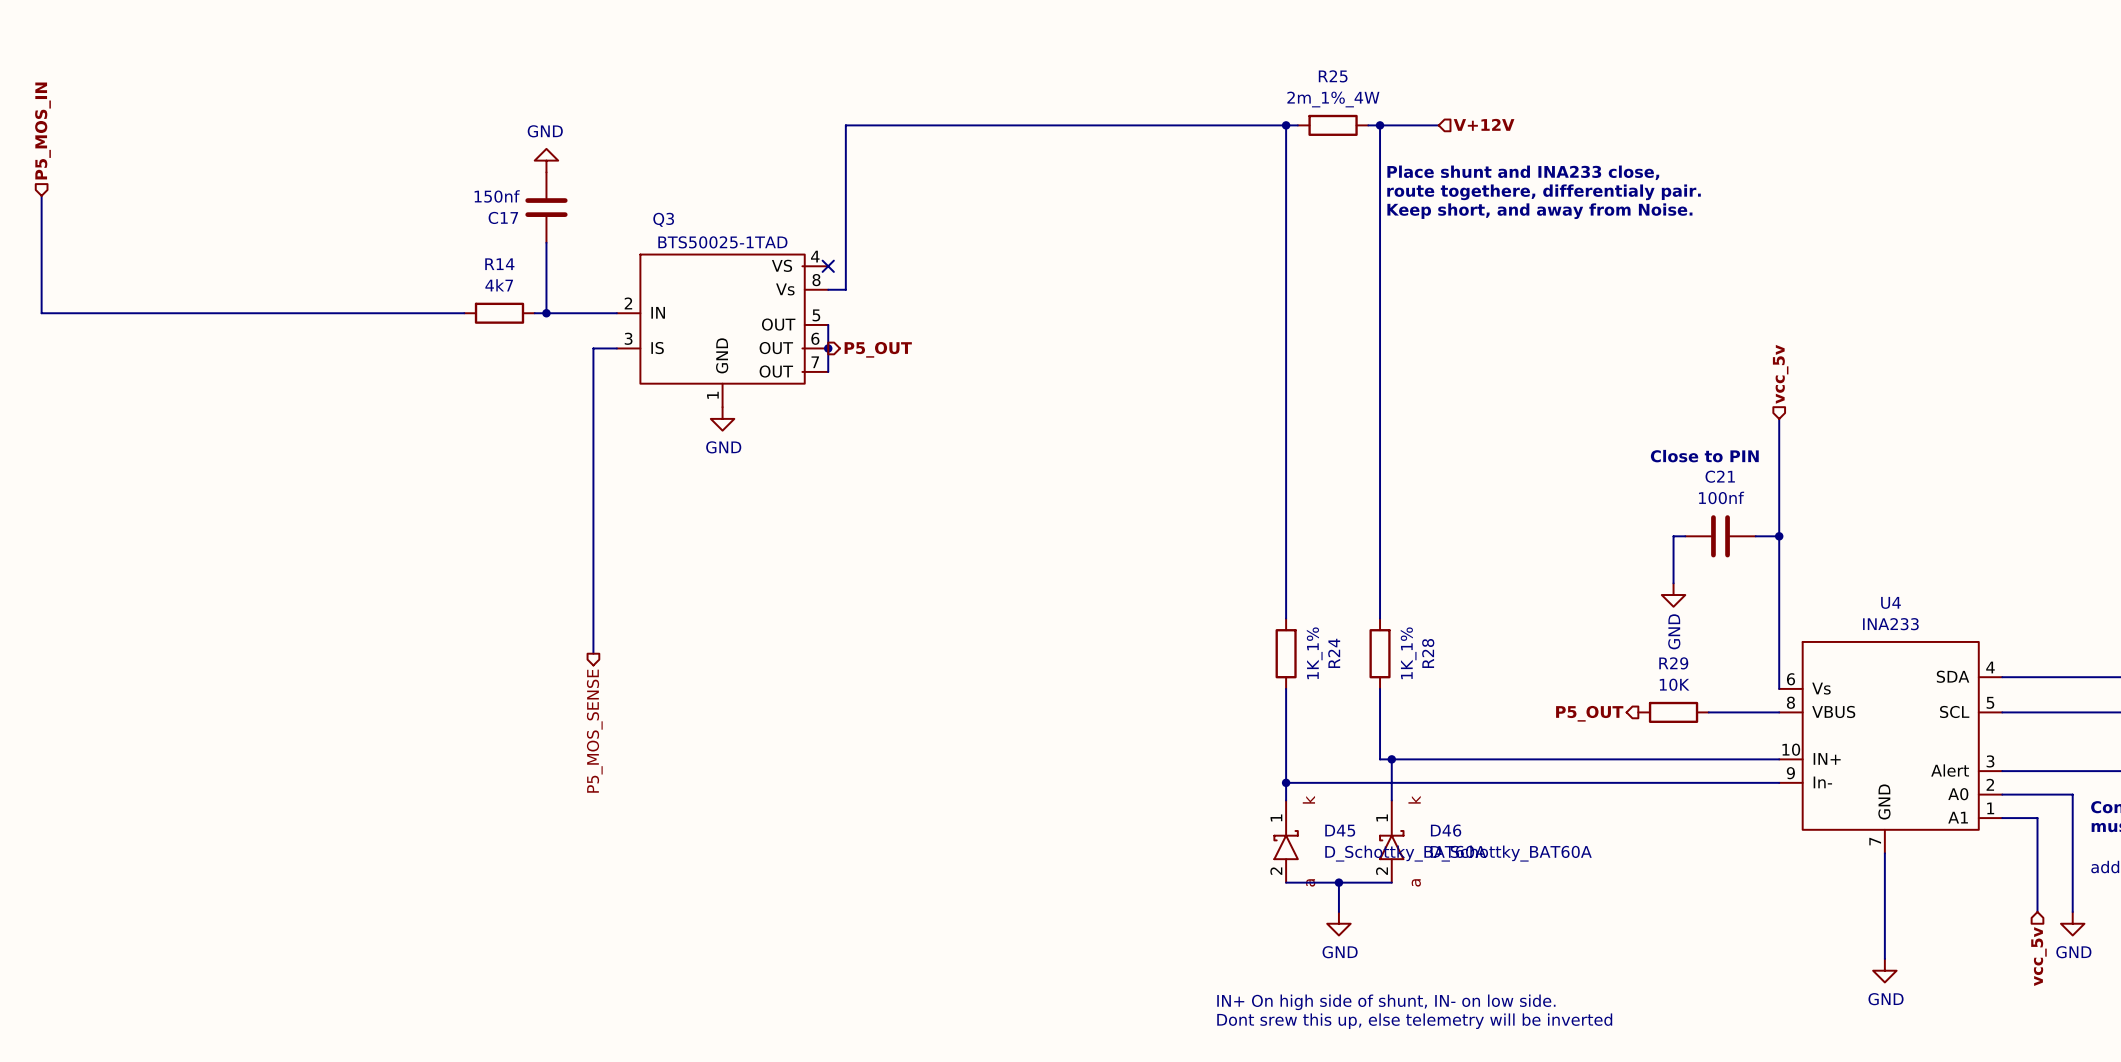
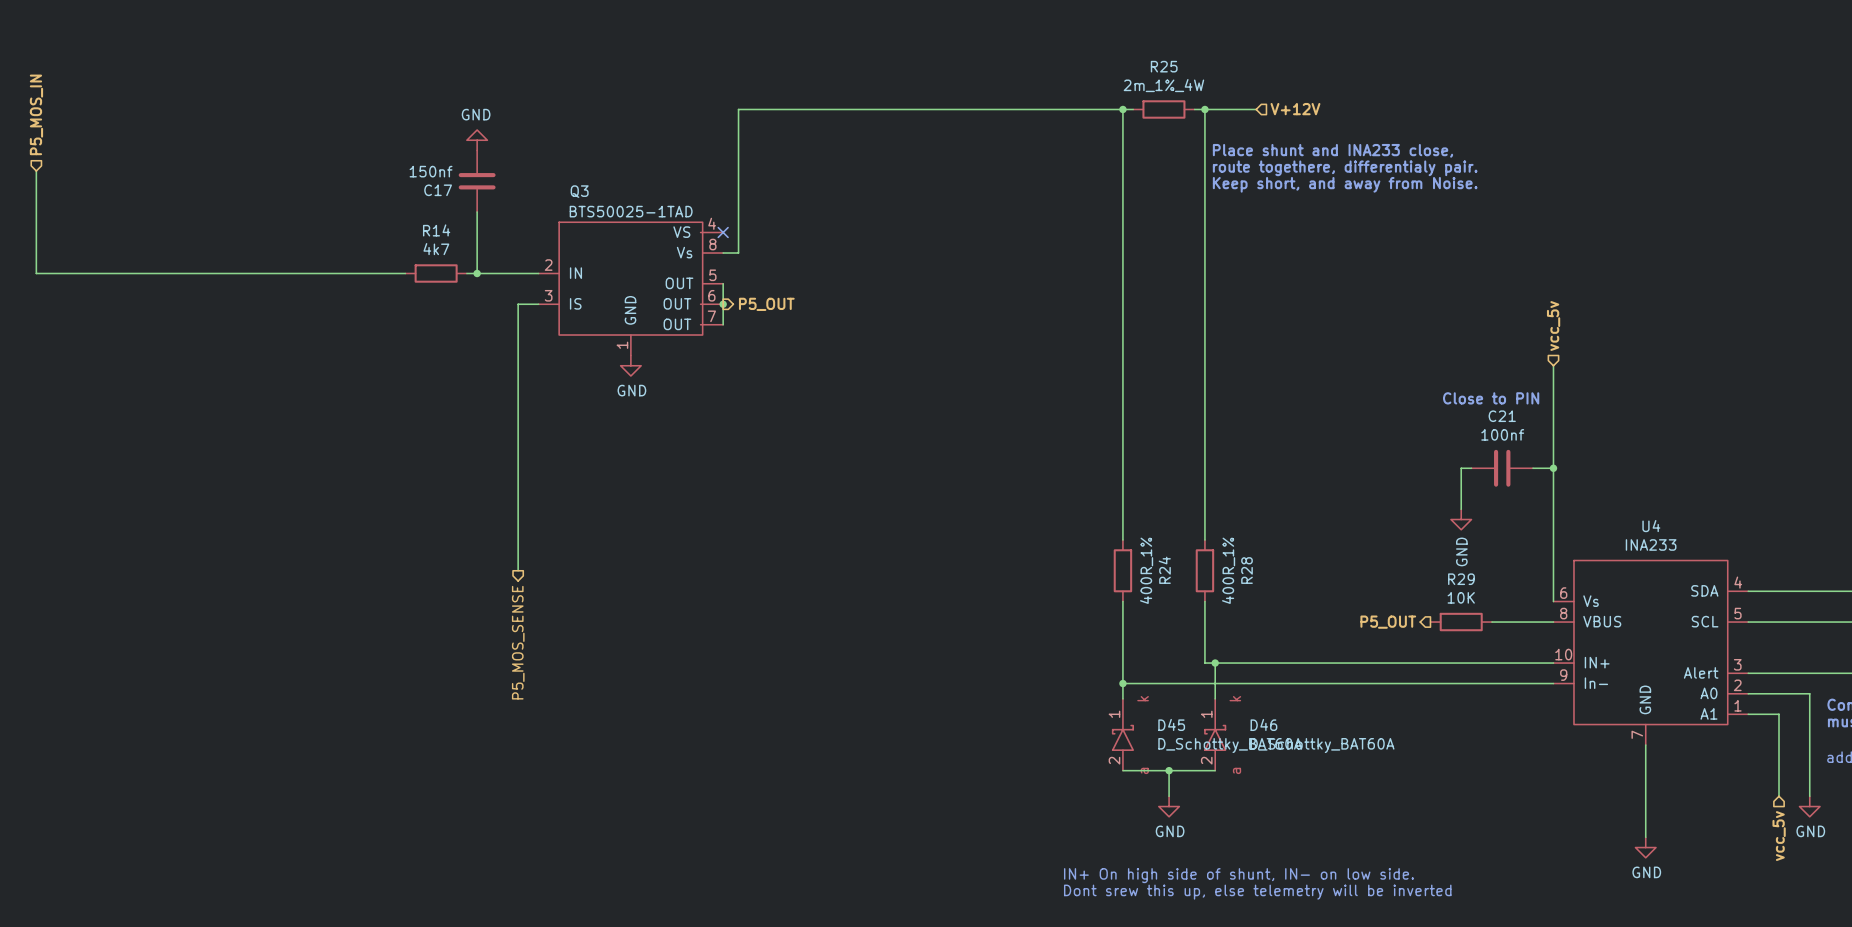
R24 value: 1K_1% (1314, 653) -> 400R_1% (1146, 570)
R28 value: 1K_1% (1408, 653) -> 400R_1% (1228, 570)

